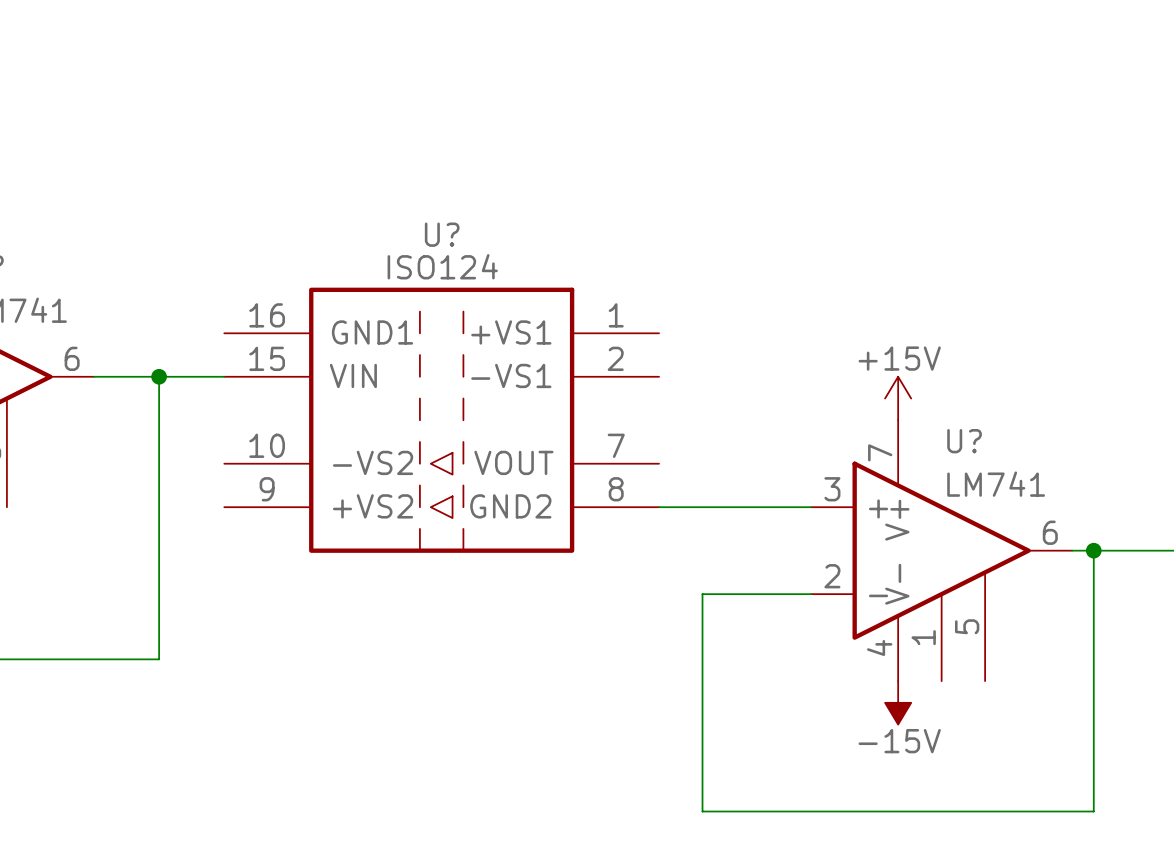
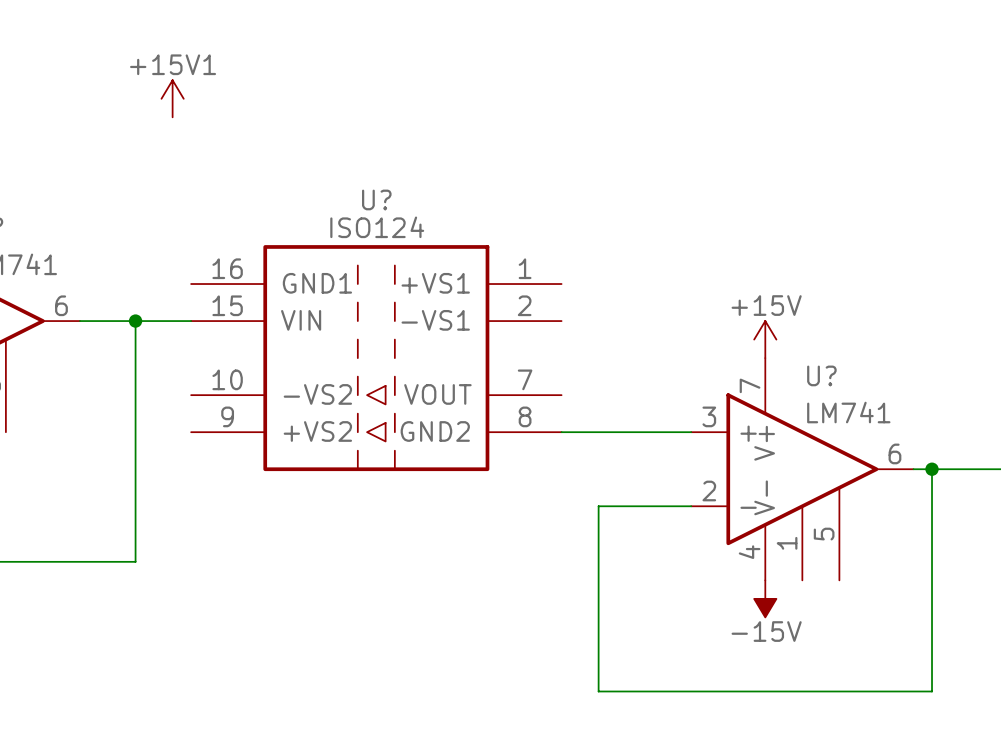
power symbol: none -> +15V1 (172, 98)

